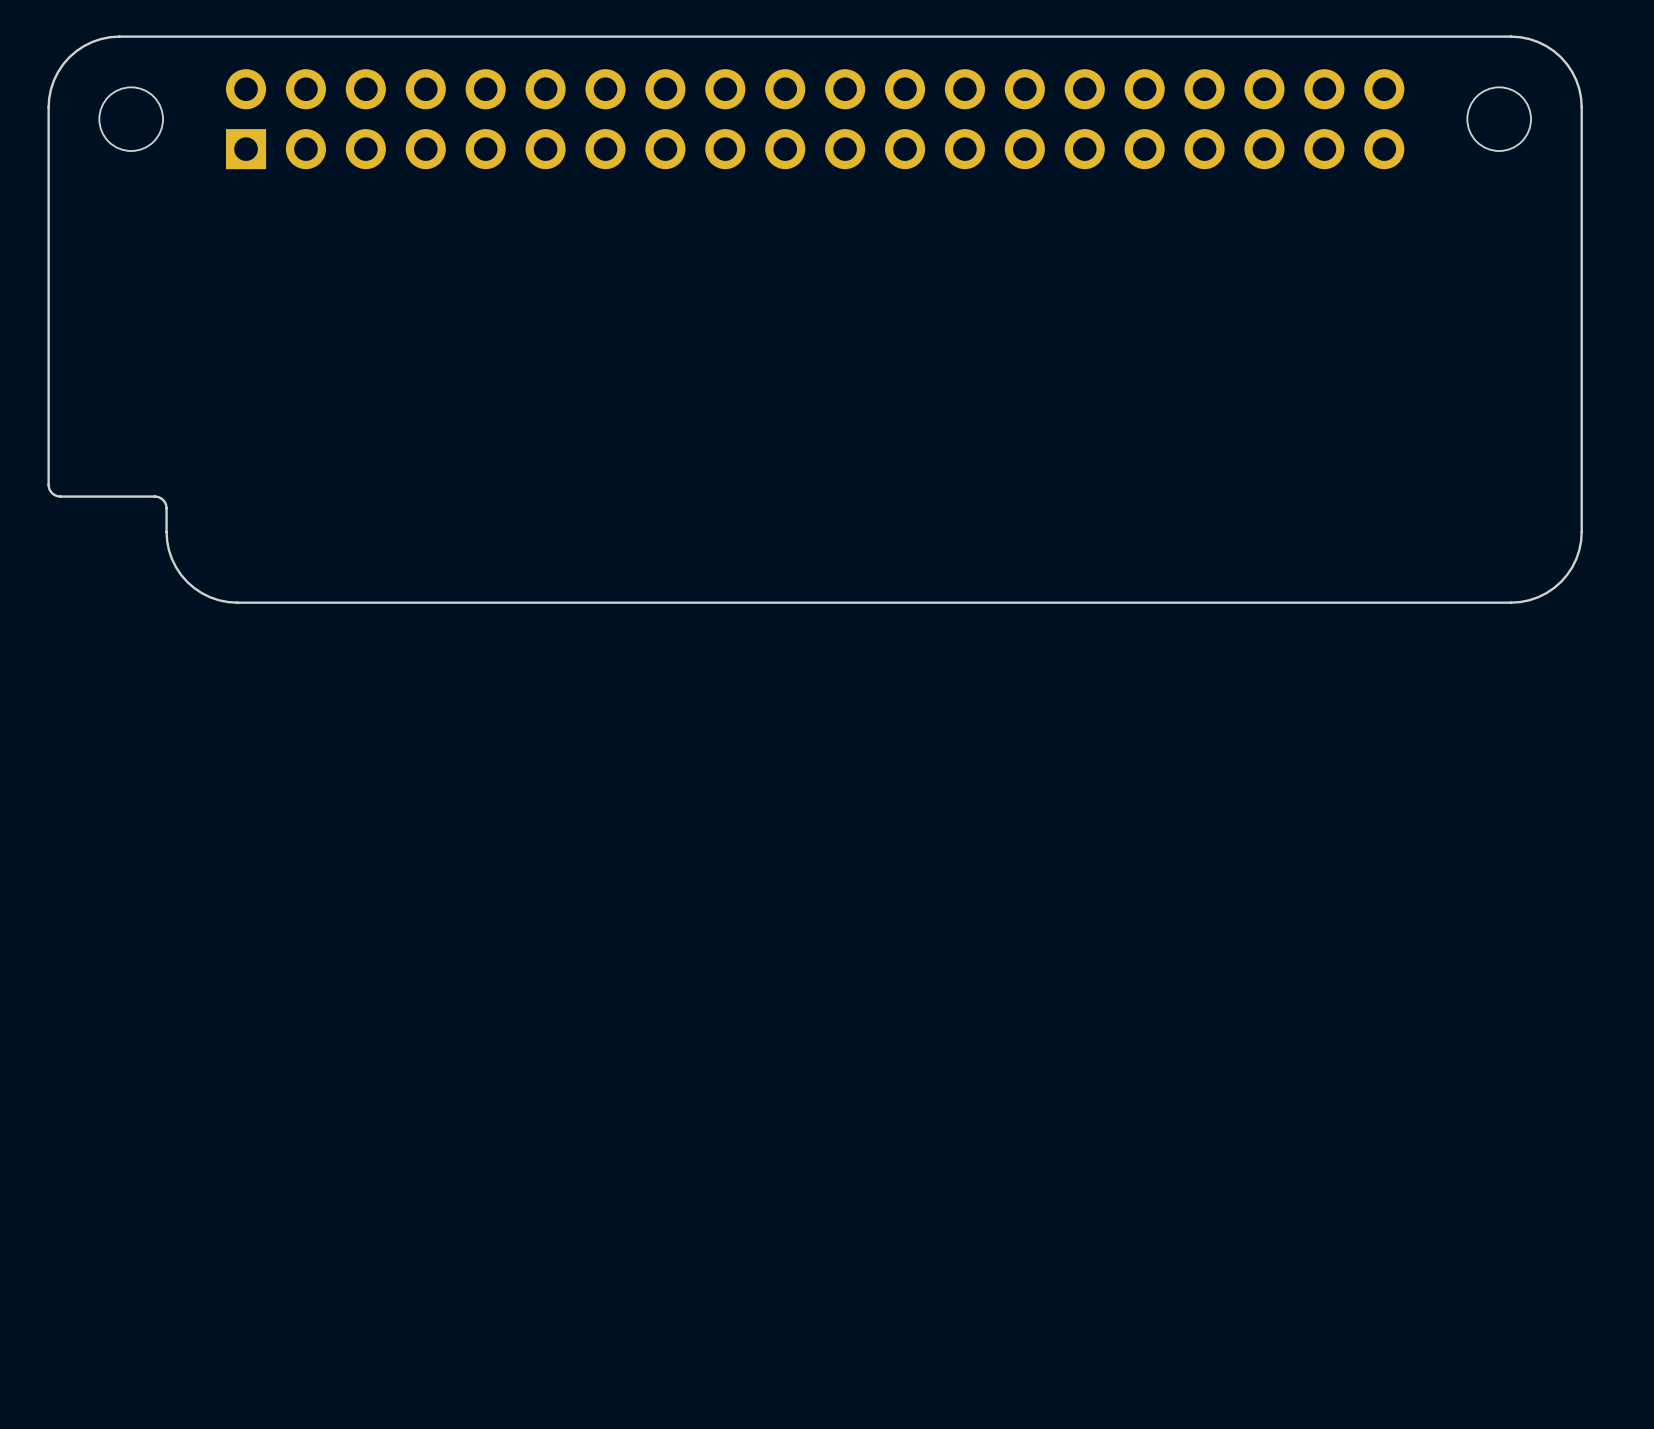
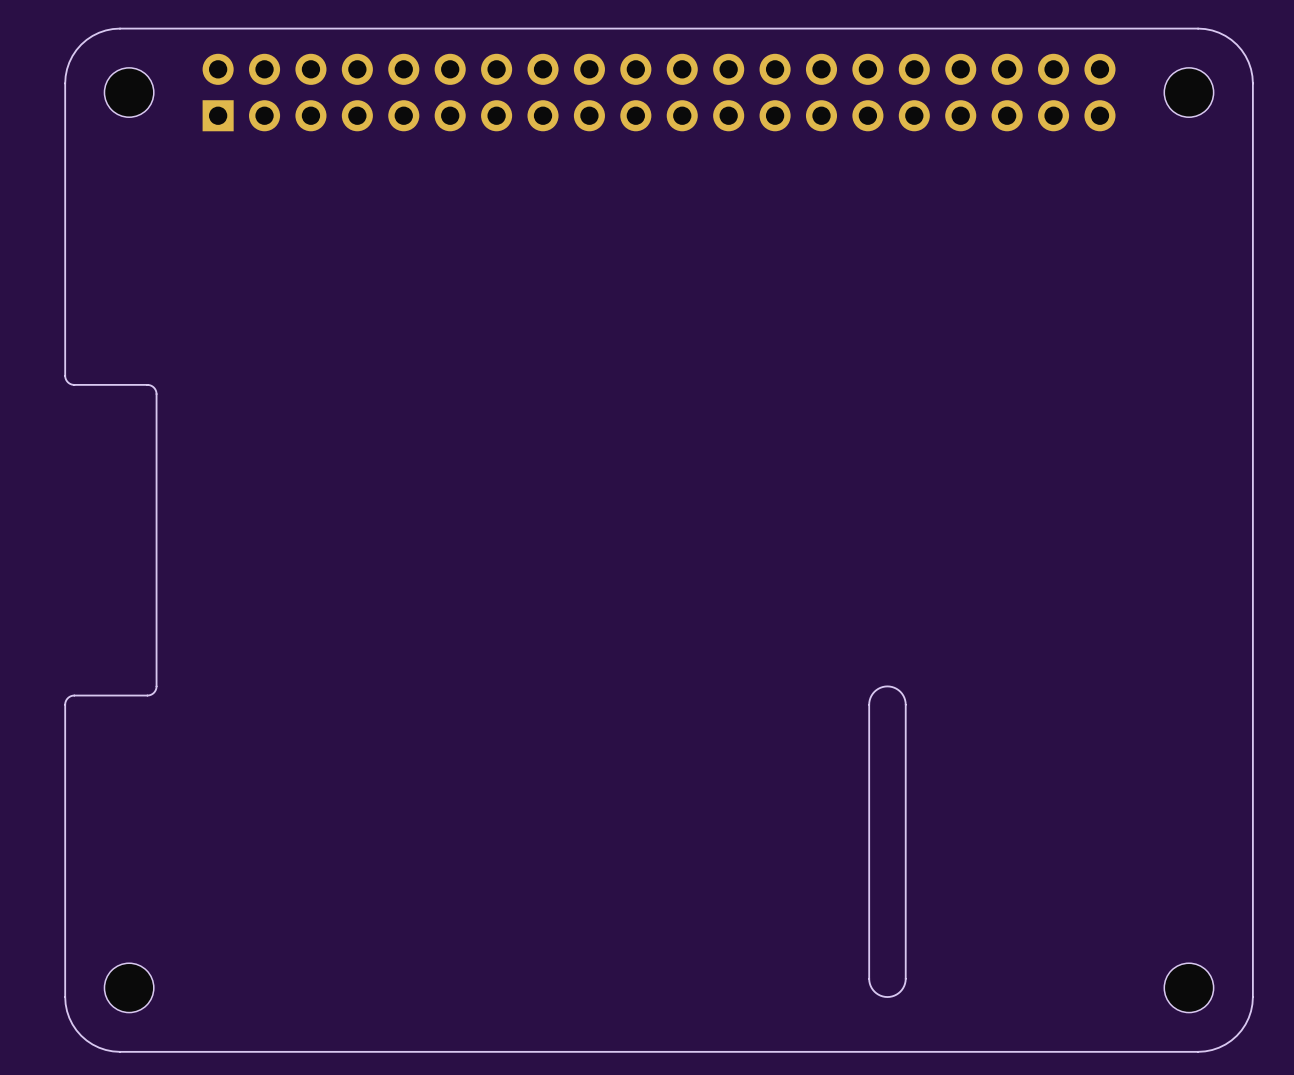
board edge: (166, 531) (171, 559) (187, 581) (210, 597) (237, 602) (1510, 602) (1538, 597) (1560, 581) (1576, 559) (1581, 531) -> (156, 412) (156, 688) (153, 692) (148, 695) (73, 695) (67, 698) (65, 704) (65, 1004) (72, 1024) (86, 1040) (105, 1049) (120, 1051) (1198, 1051) (1212, 1049) (1225, 1044) (1236, 1035) (1245, 1024) (1251, 1011) (1252, 997) (1252, 412)
board edge: none -> (869, 704) (869, 981) (876, 993) (889, 996) (901, 989) (905, 978) (905, 702) (900, 691) (887, 686) (874, 691) (869, 704)
part: none -> (129, 987)
part: none -> (1188, 987)

